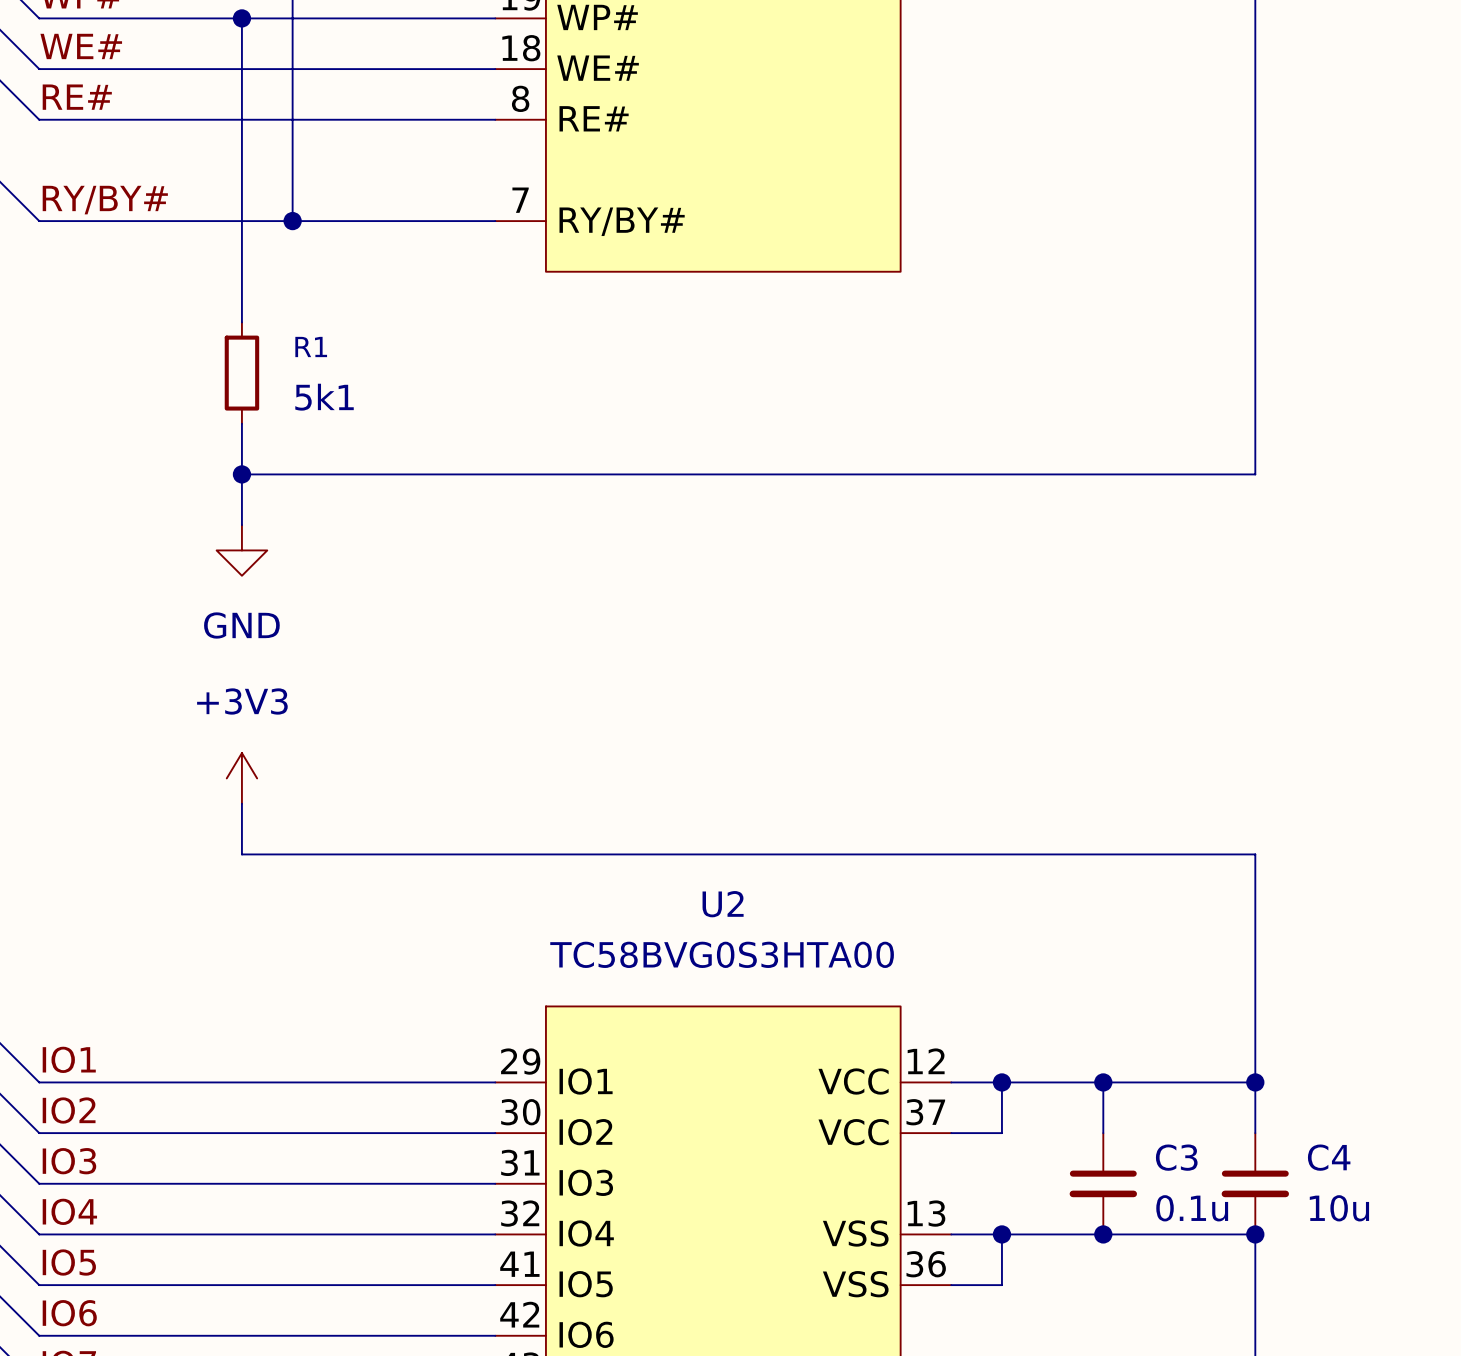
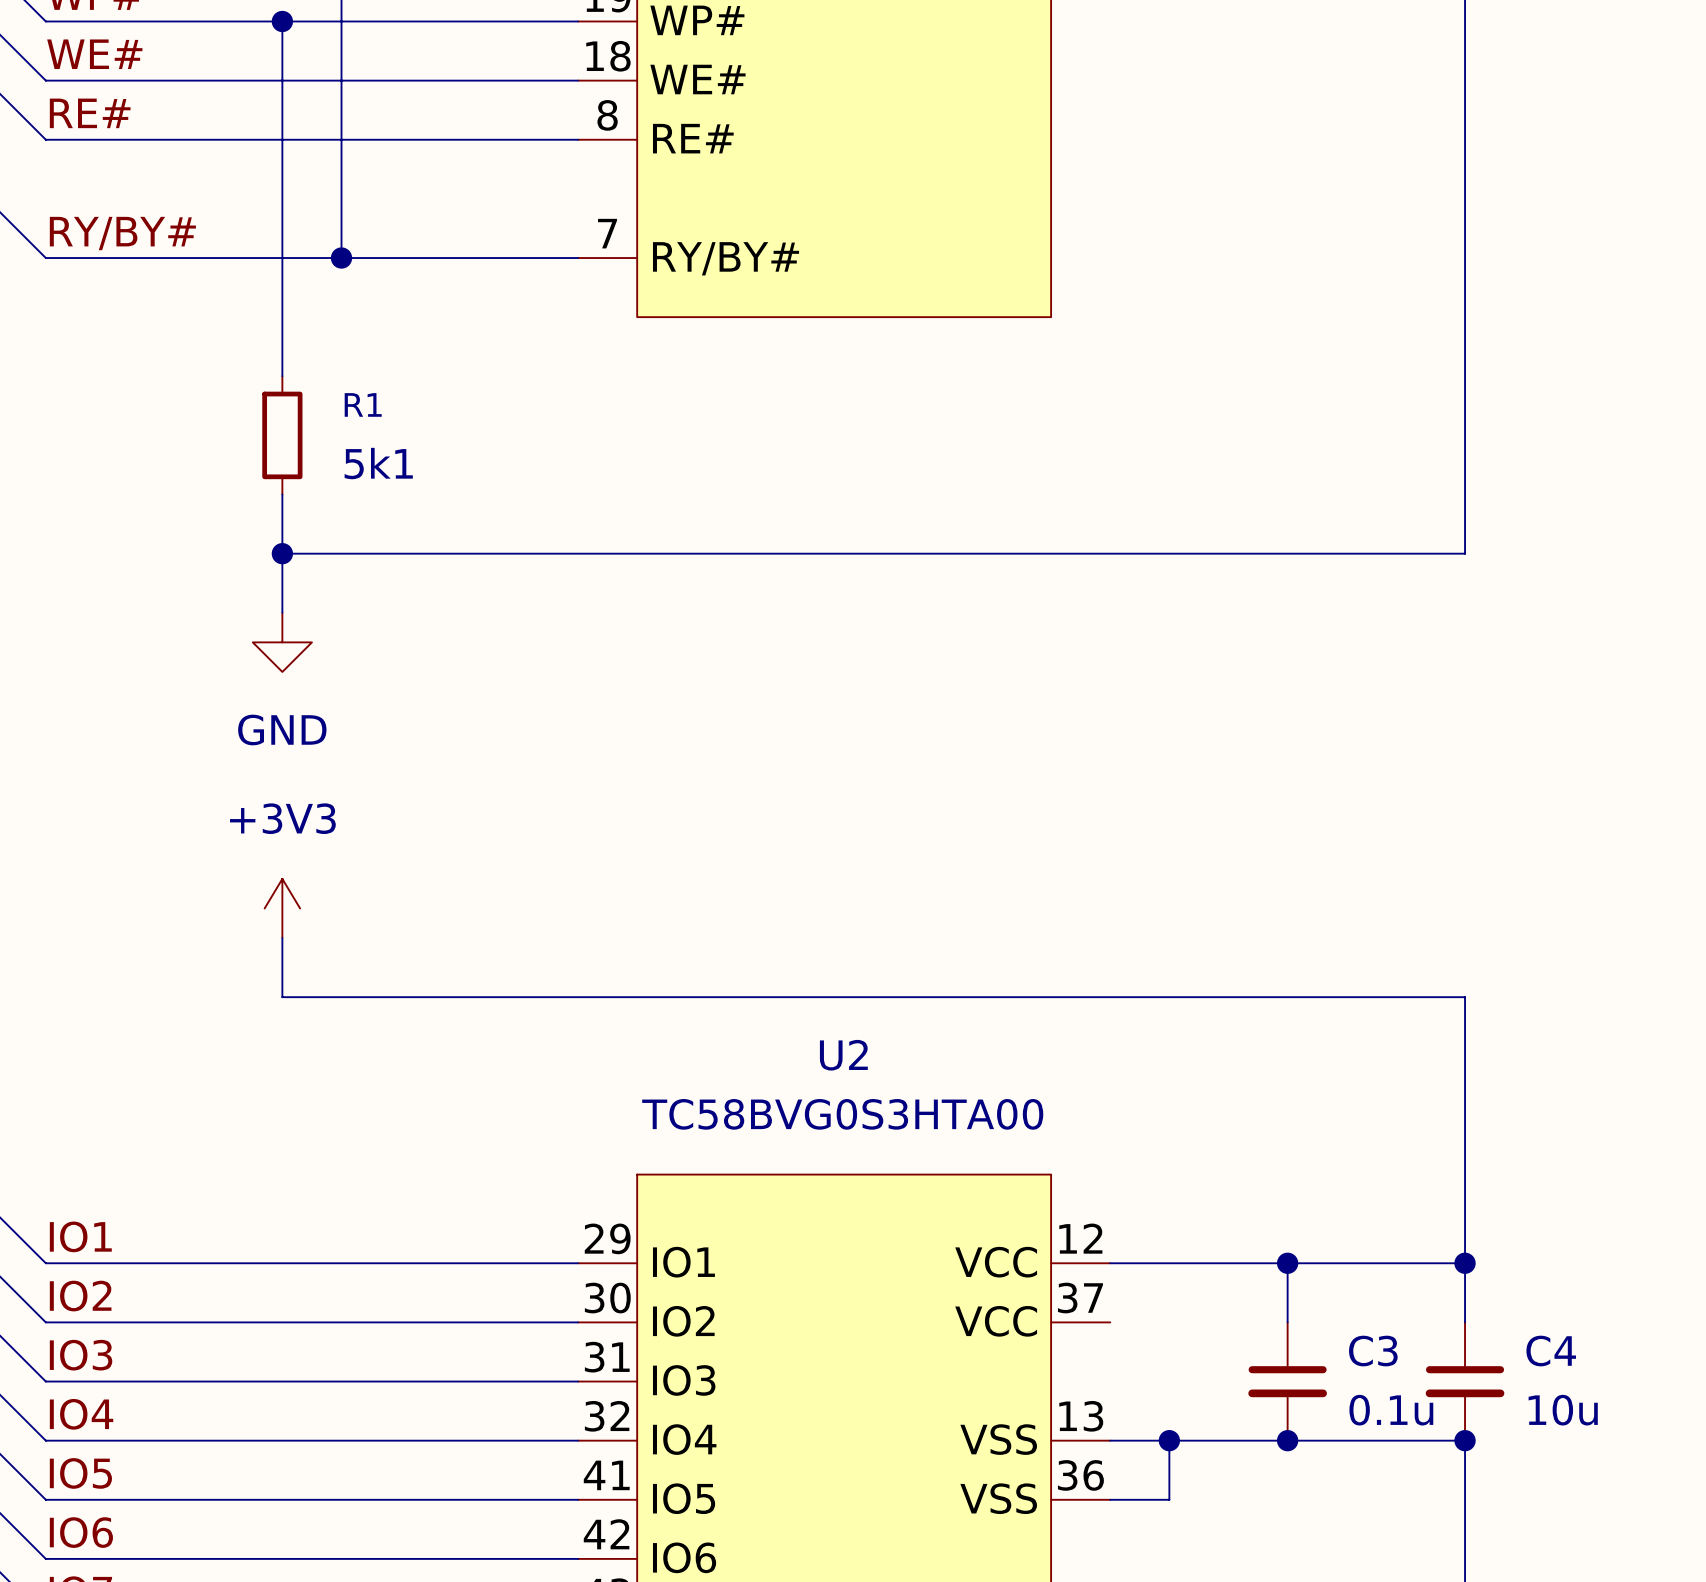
wire: (1001, 1082) (1001, 1133) (951, 1133) -> none
junction: (1001, 1082) -> none

